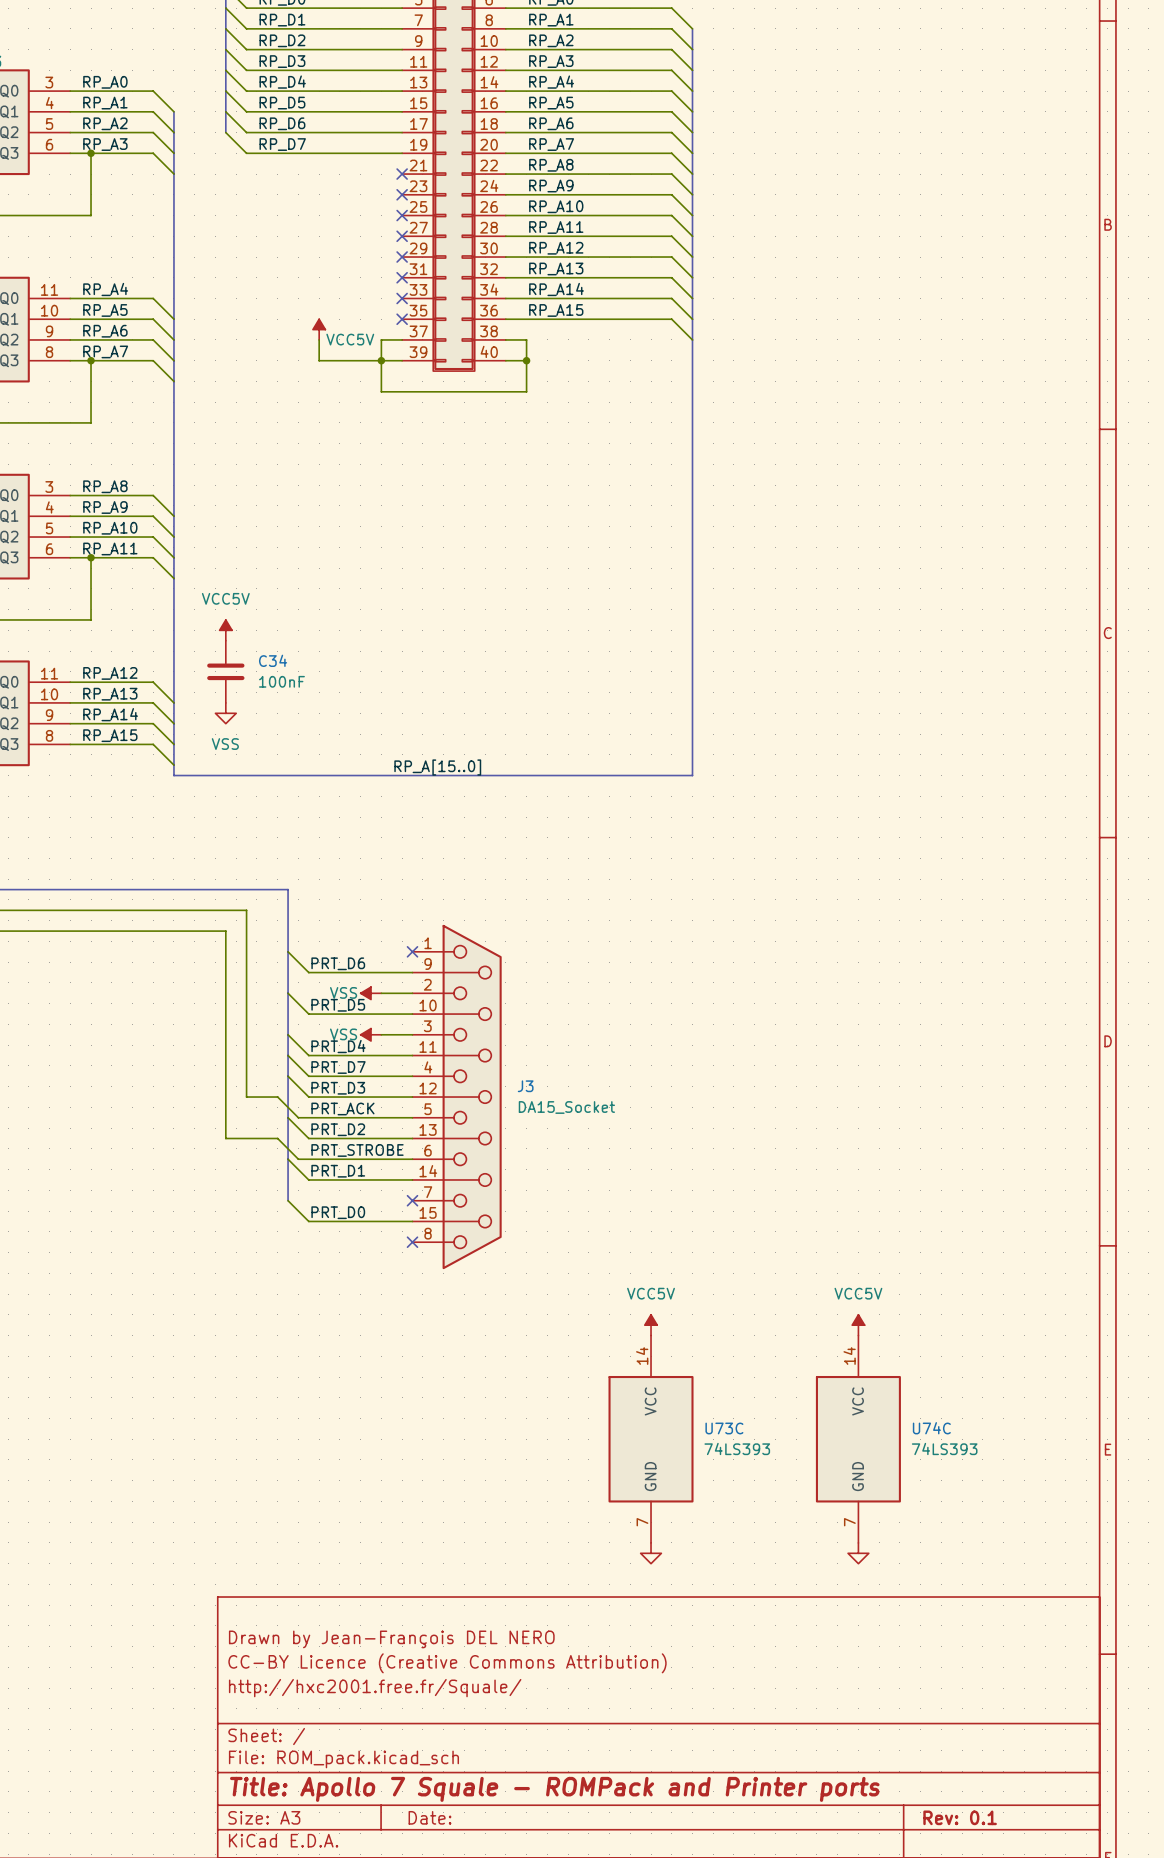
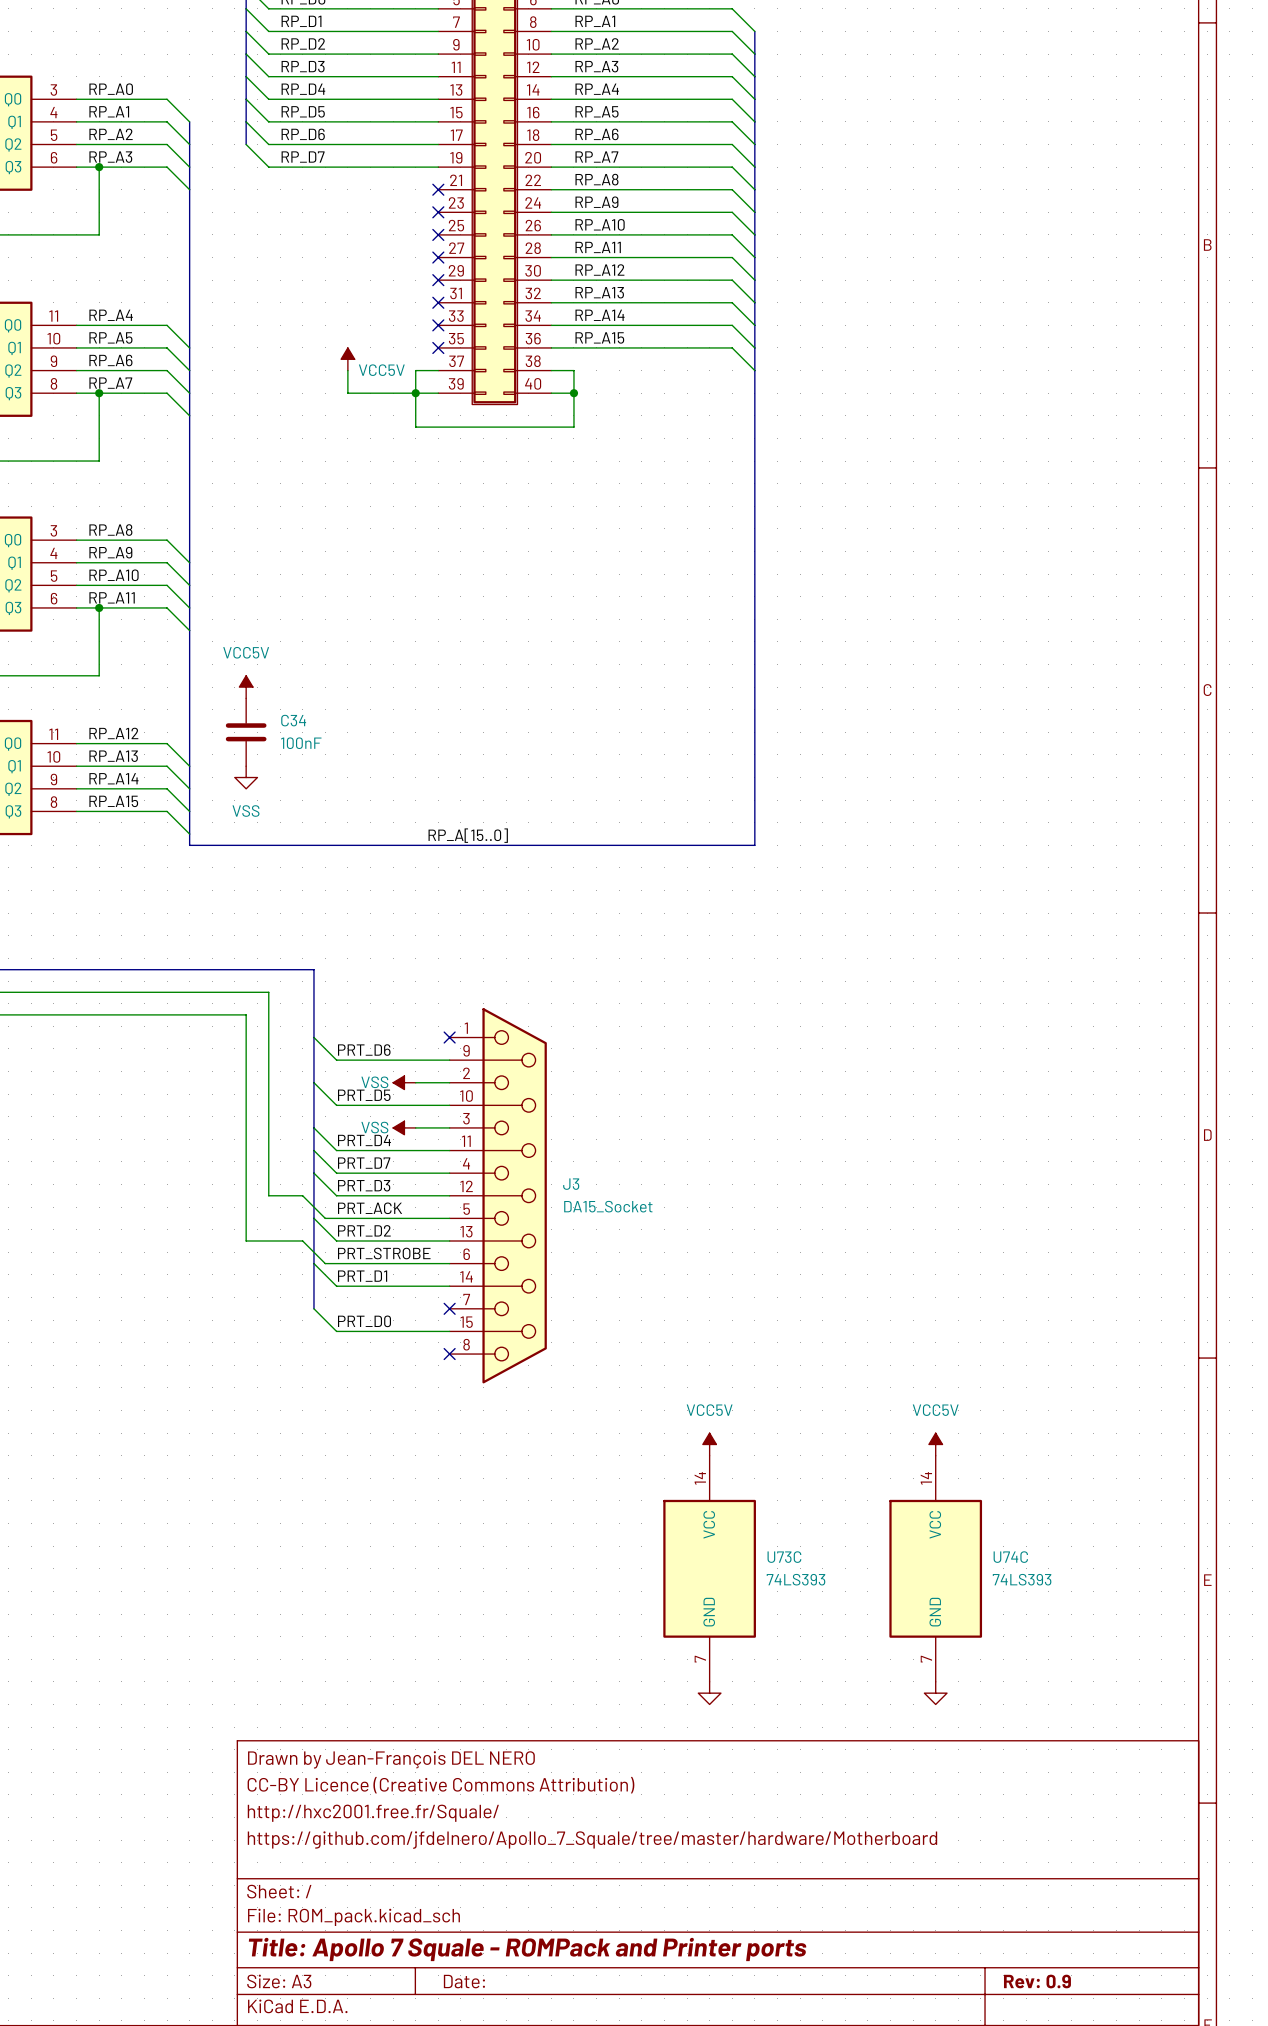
title block: none -> Drawn by Jean-François DEL NERO (391, 1759)
title block: Drawn by Jean-François DEL NERO (391, 1639) -> CC-BY Licence (Creative Commons Attribution) (440, 1785)
title block: CC-BY Licence (Creative Commons Attribution) (447, 1663) -> http://hxc2001.free.fr/Squale/ (373, 1813)
title block: http://hxc2001.free.fr/Squale/ (375, 1688) -> https://github.com/jfdelnero/Apollo_7_Squale/tree/master/hardware/Motherboard (592, 1840)
title block: Rev: 0.1 (960, 1817) -> Rev: 0.9 (1037, 1981)

